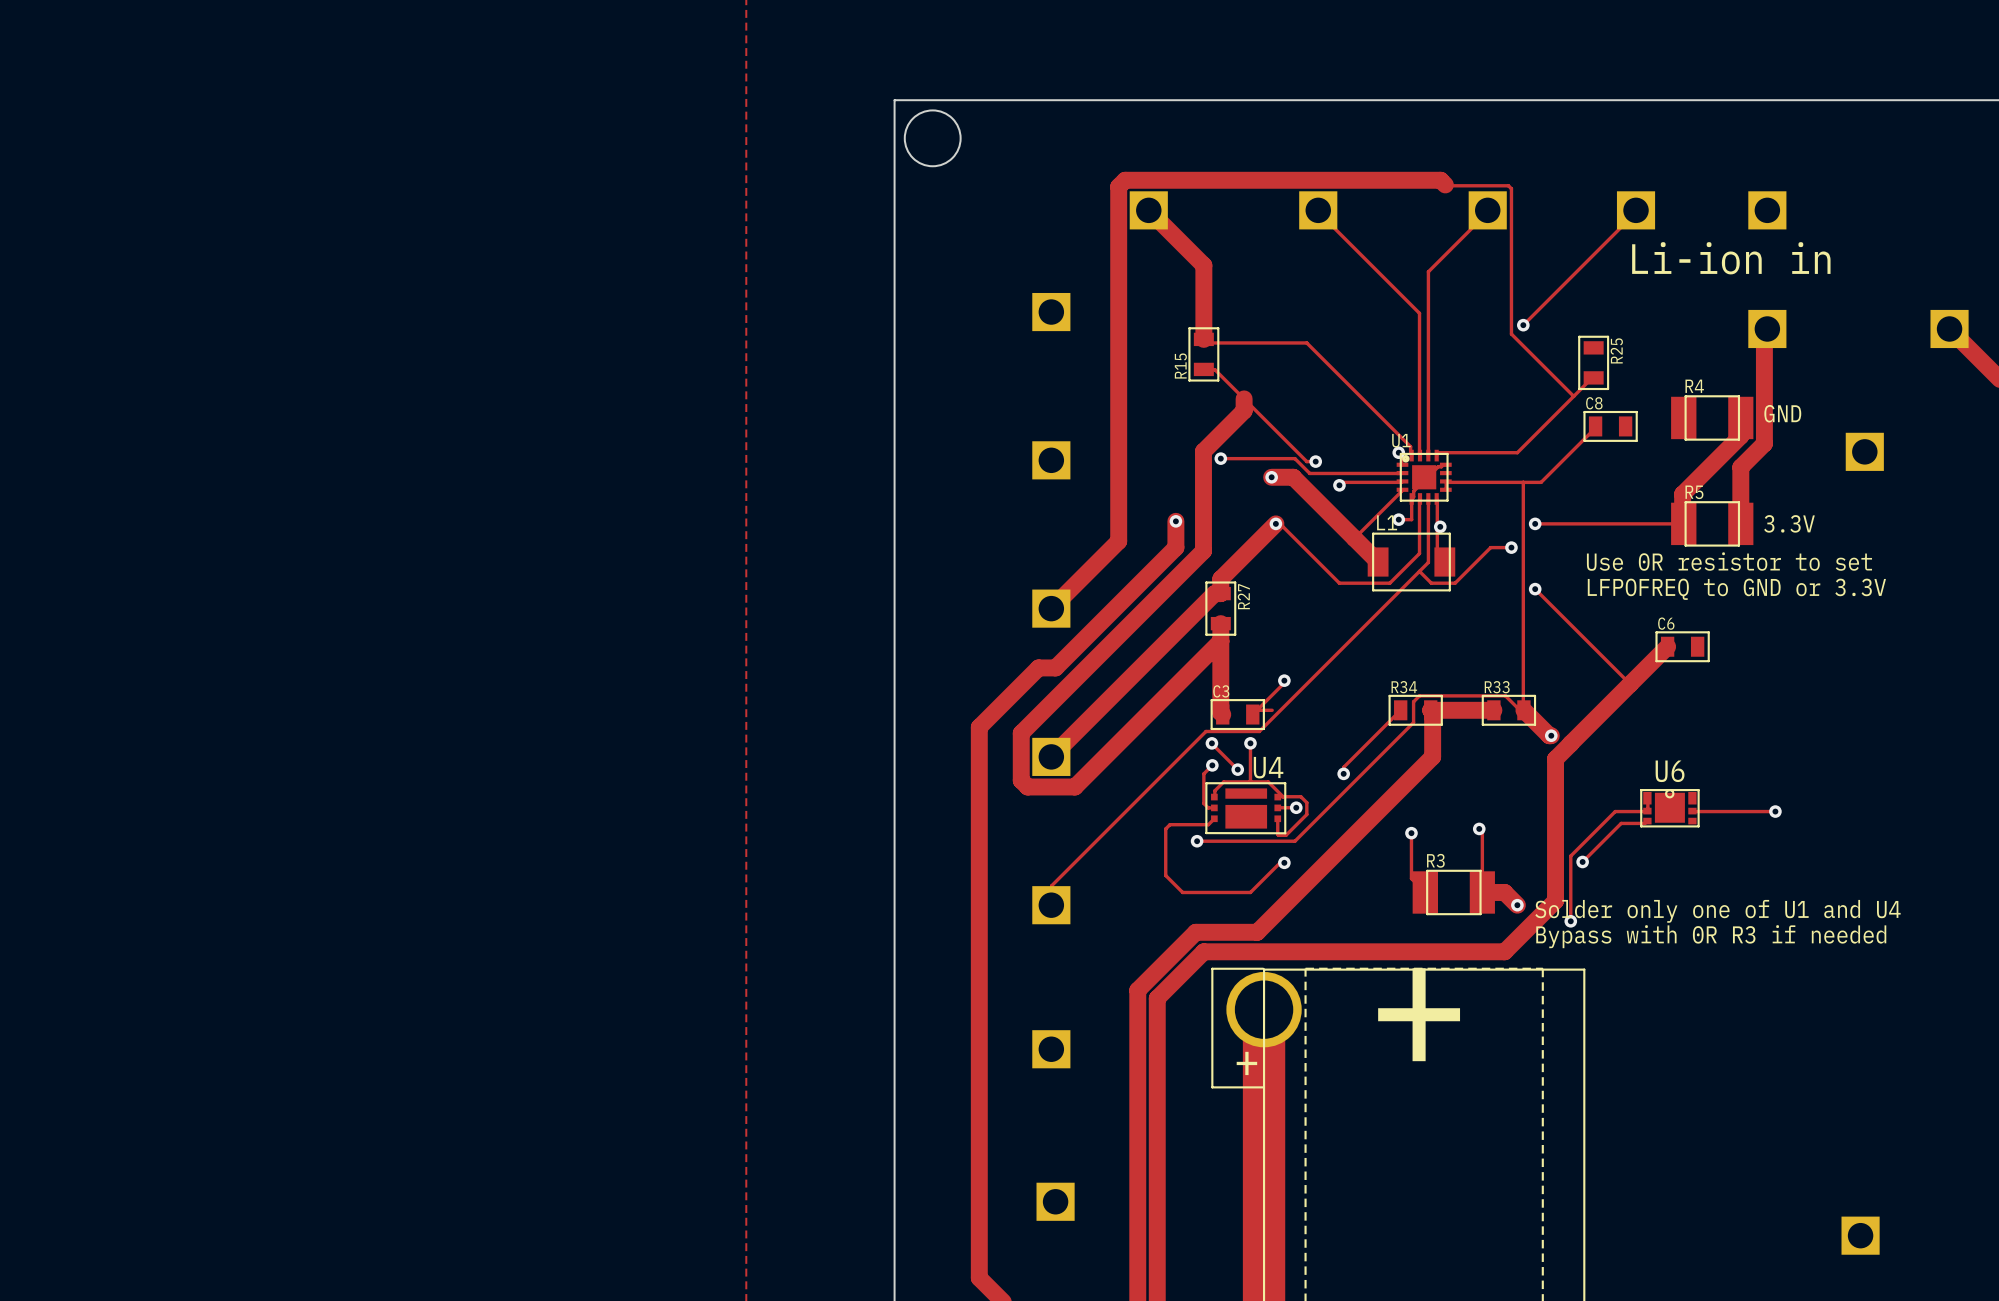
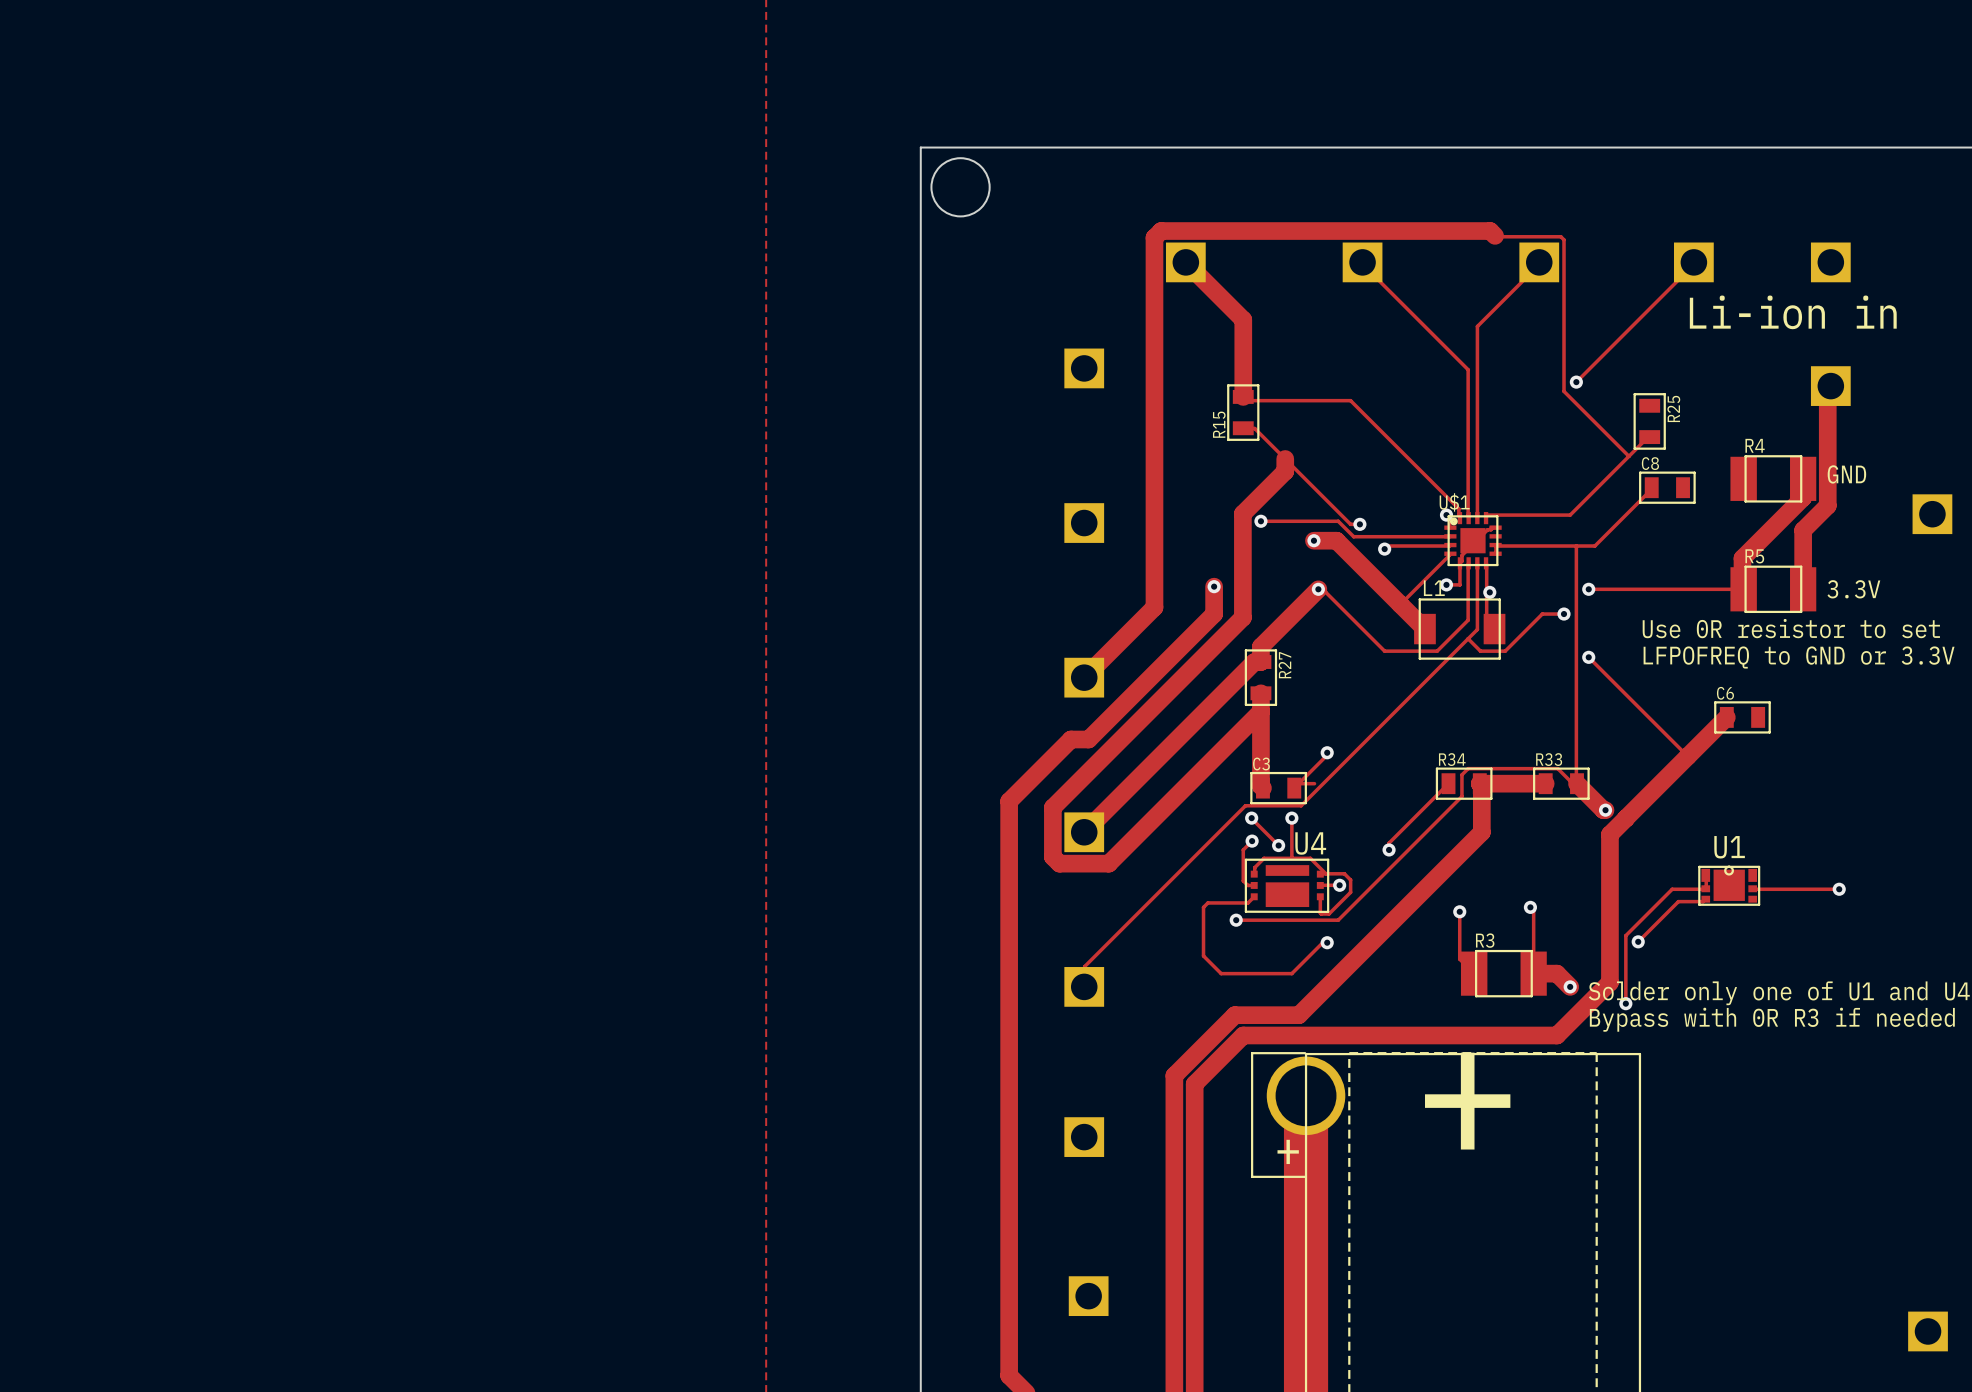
U1 name: U1 (1401, 440) -> U$1 (1454, 502)
U6 name: U6 (1670, 771) -> U1 (1729, 847)

